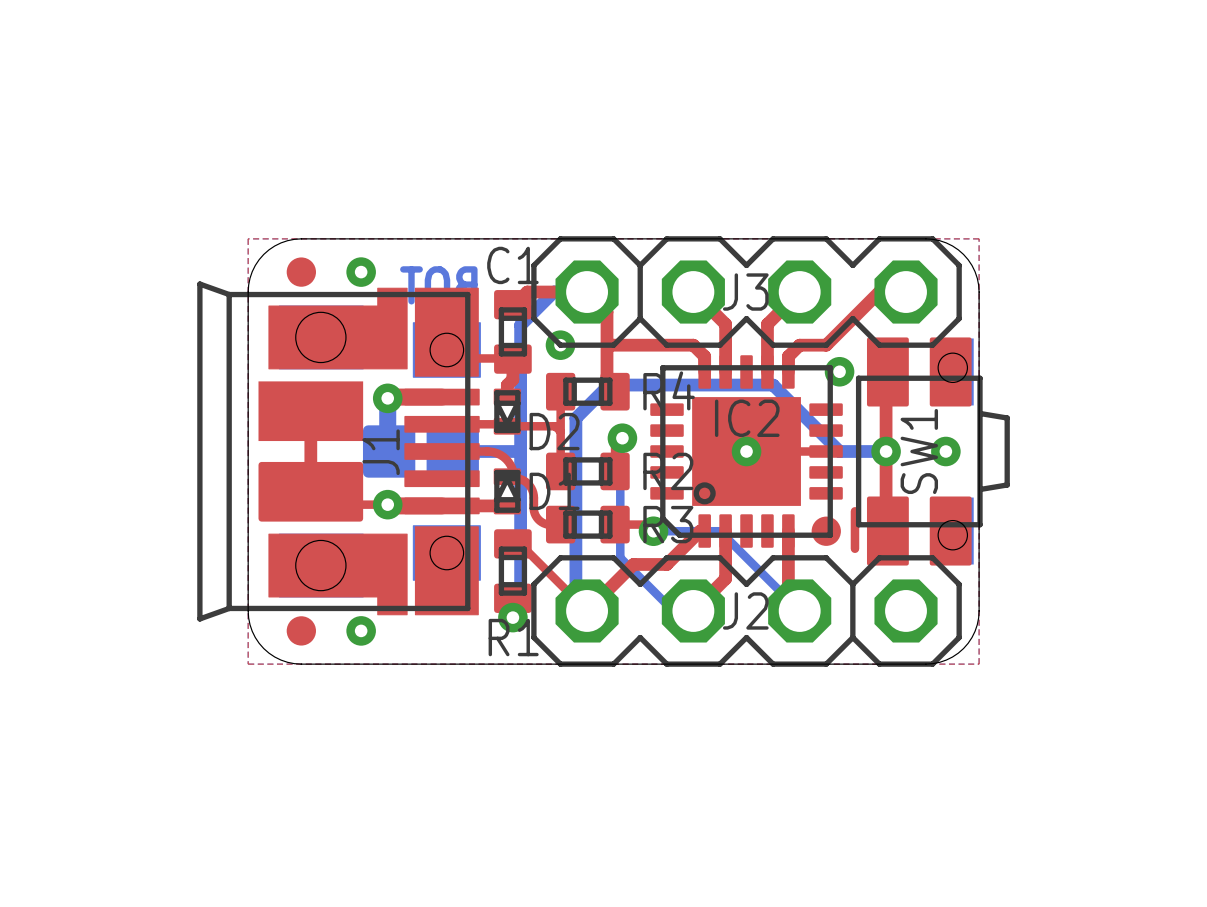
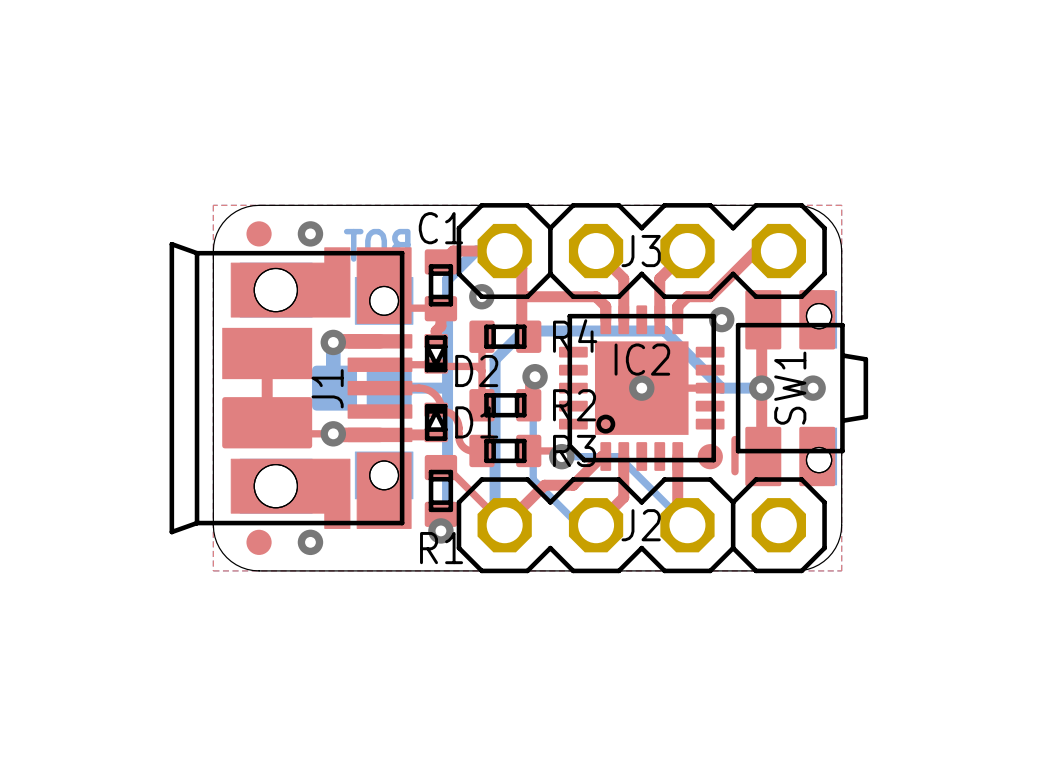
J1 footprint: [197, 281, 481, 622] -> [169, 241, 414, 535]
SW1 footprint: [855, 337, 1010, 566] -> [735, 290, 869, 487]

